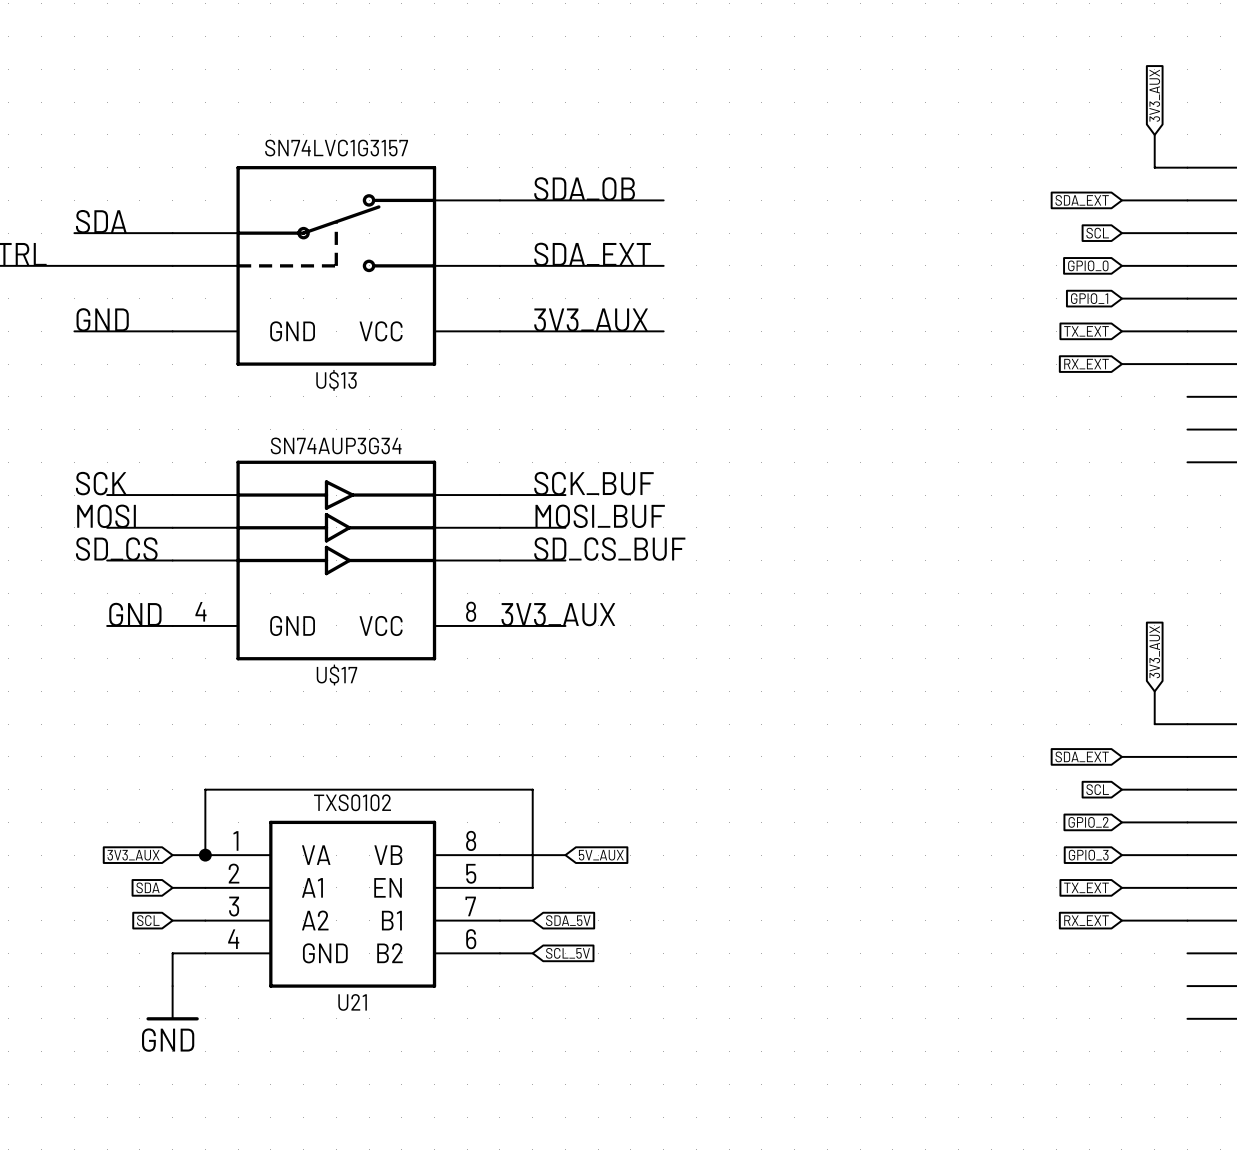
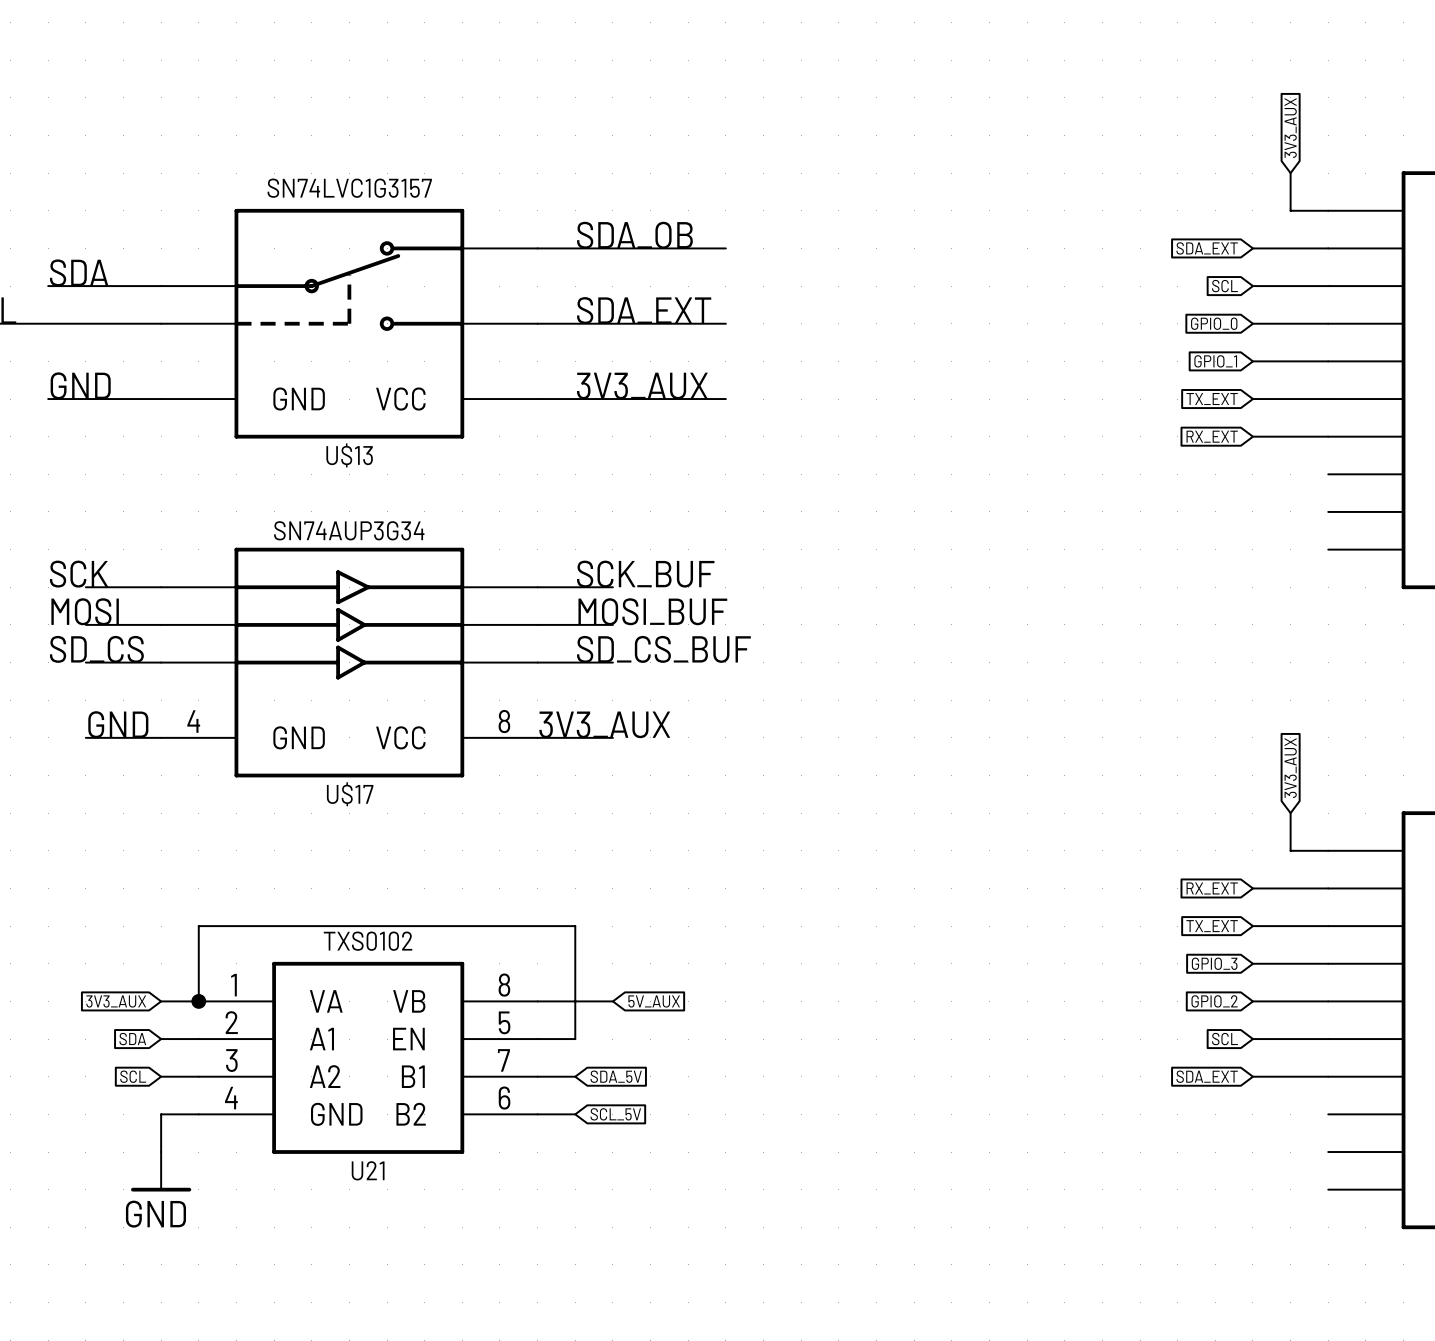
global label: SDA_EXT (1082, 756) -> RX_EXT (1212, 888)
global label: SCL (1097, 789) -> TX_EXT (1212, 926)
global label: GPIO_2 (1088, 822) -> GPIO_3 (1214, 963)
global label: GPIO_3 (1088, 855) -> GPIO_2 (1214, 1001)
global label: TX_EXT (1086, 887) -> SCL (1225, 1039)
global label: RX_EXT (1086, 920) -> SDA_EXT (1207, 1076)

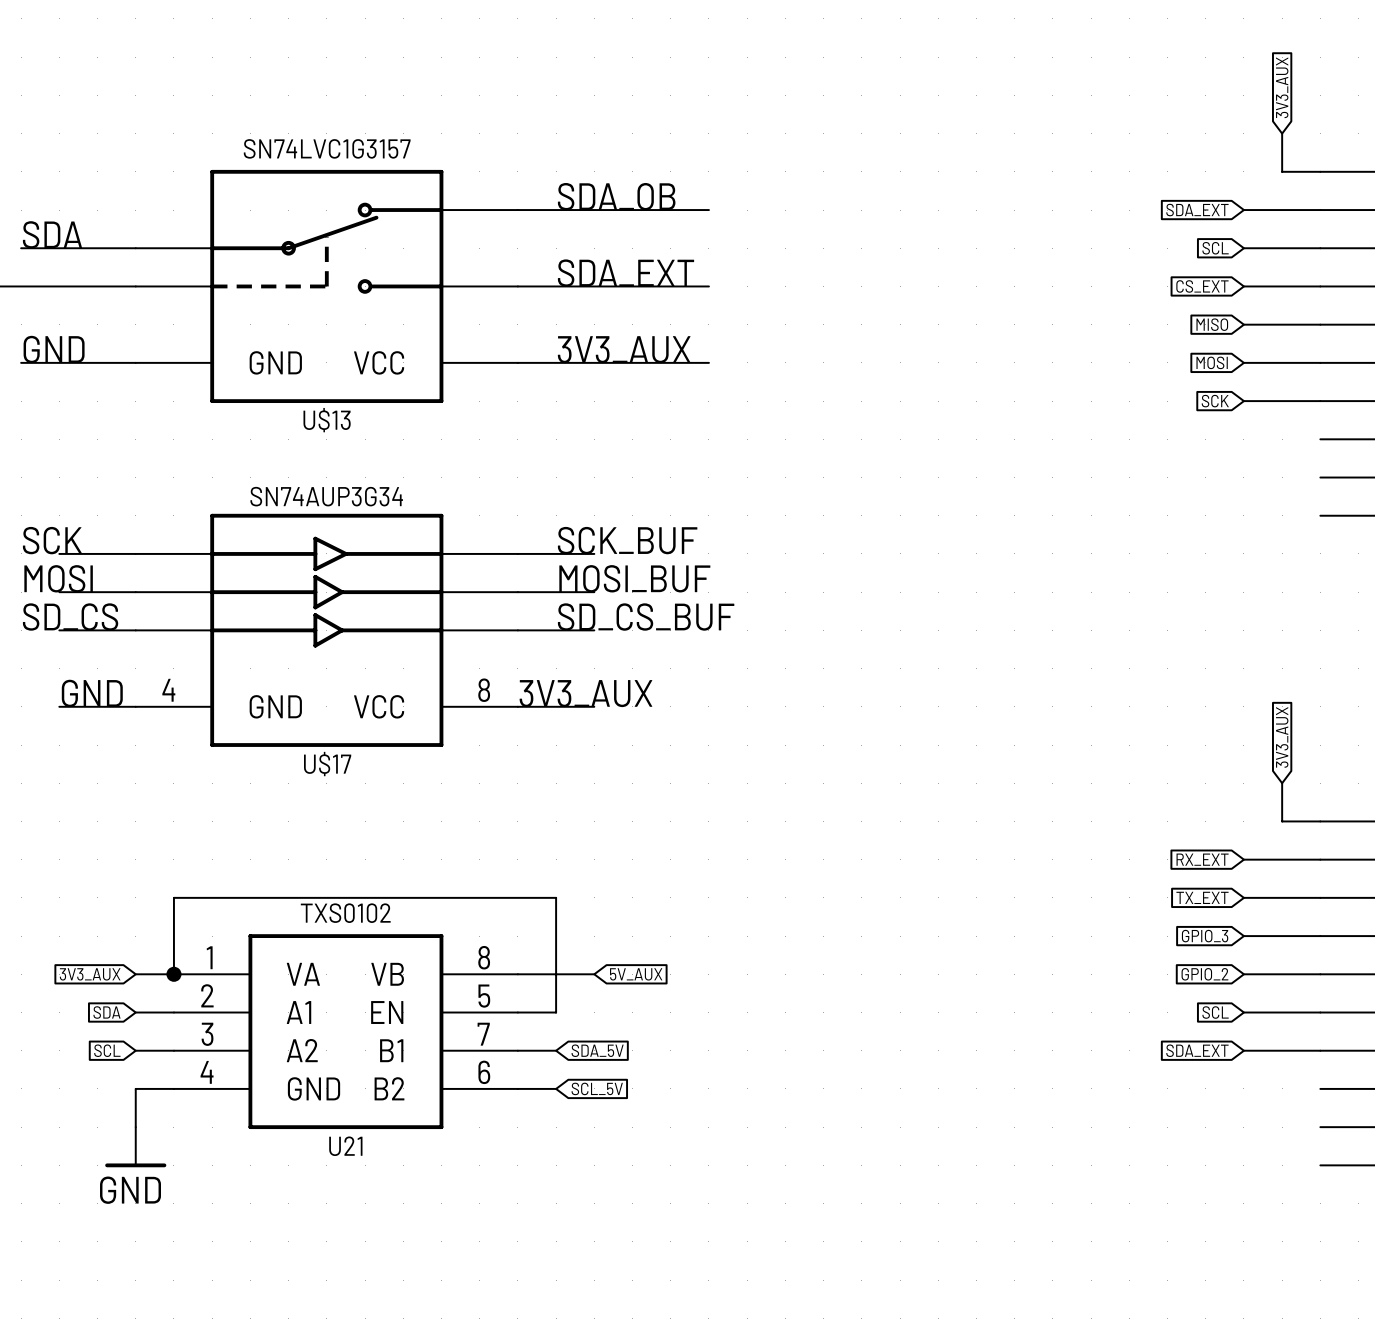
global label: GPIO_0 (1214, 323) -> CS_EXT (1202, 286)
global label: GPIO_1 (1215, 361) -> MISO (1212, 324)
global label: TX_EXT (1212, 399) -> MOSI (1212, 362)
global label: RX_EXT (1212, 436) -> SCK (1215, 401)

